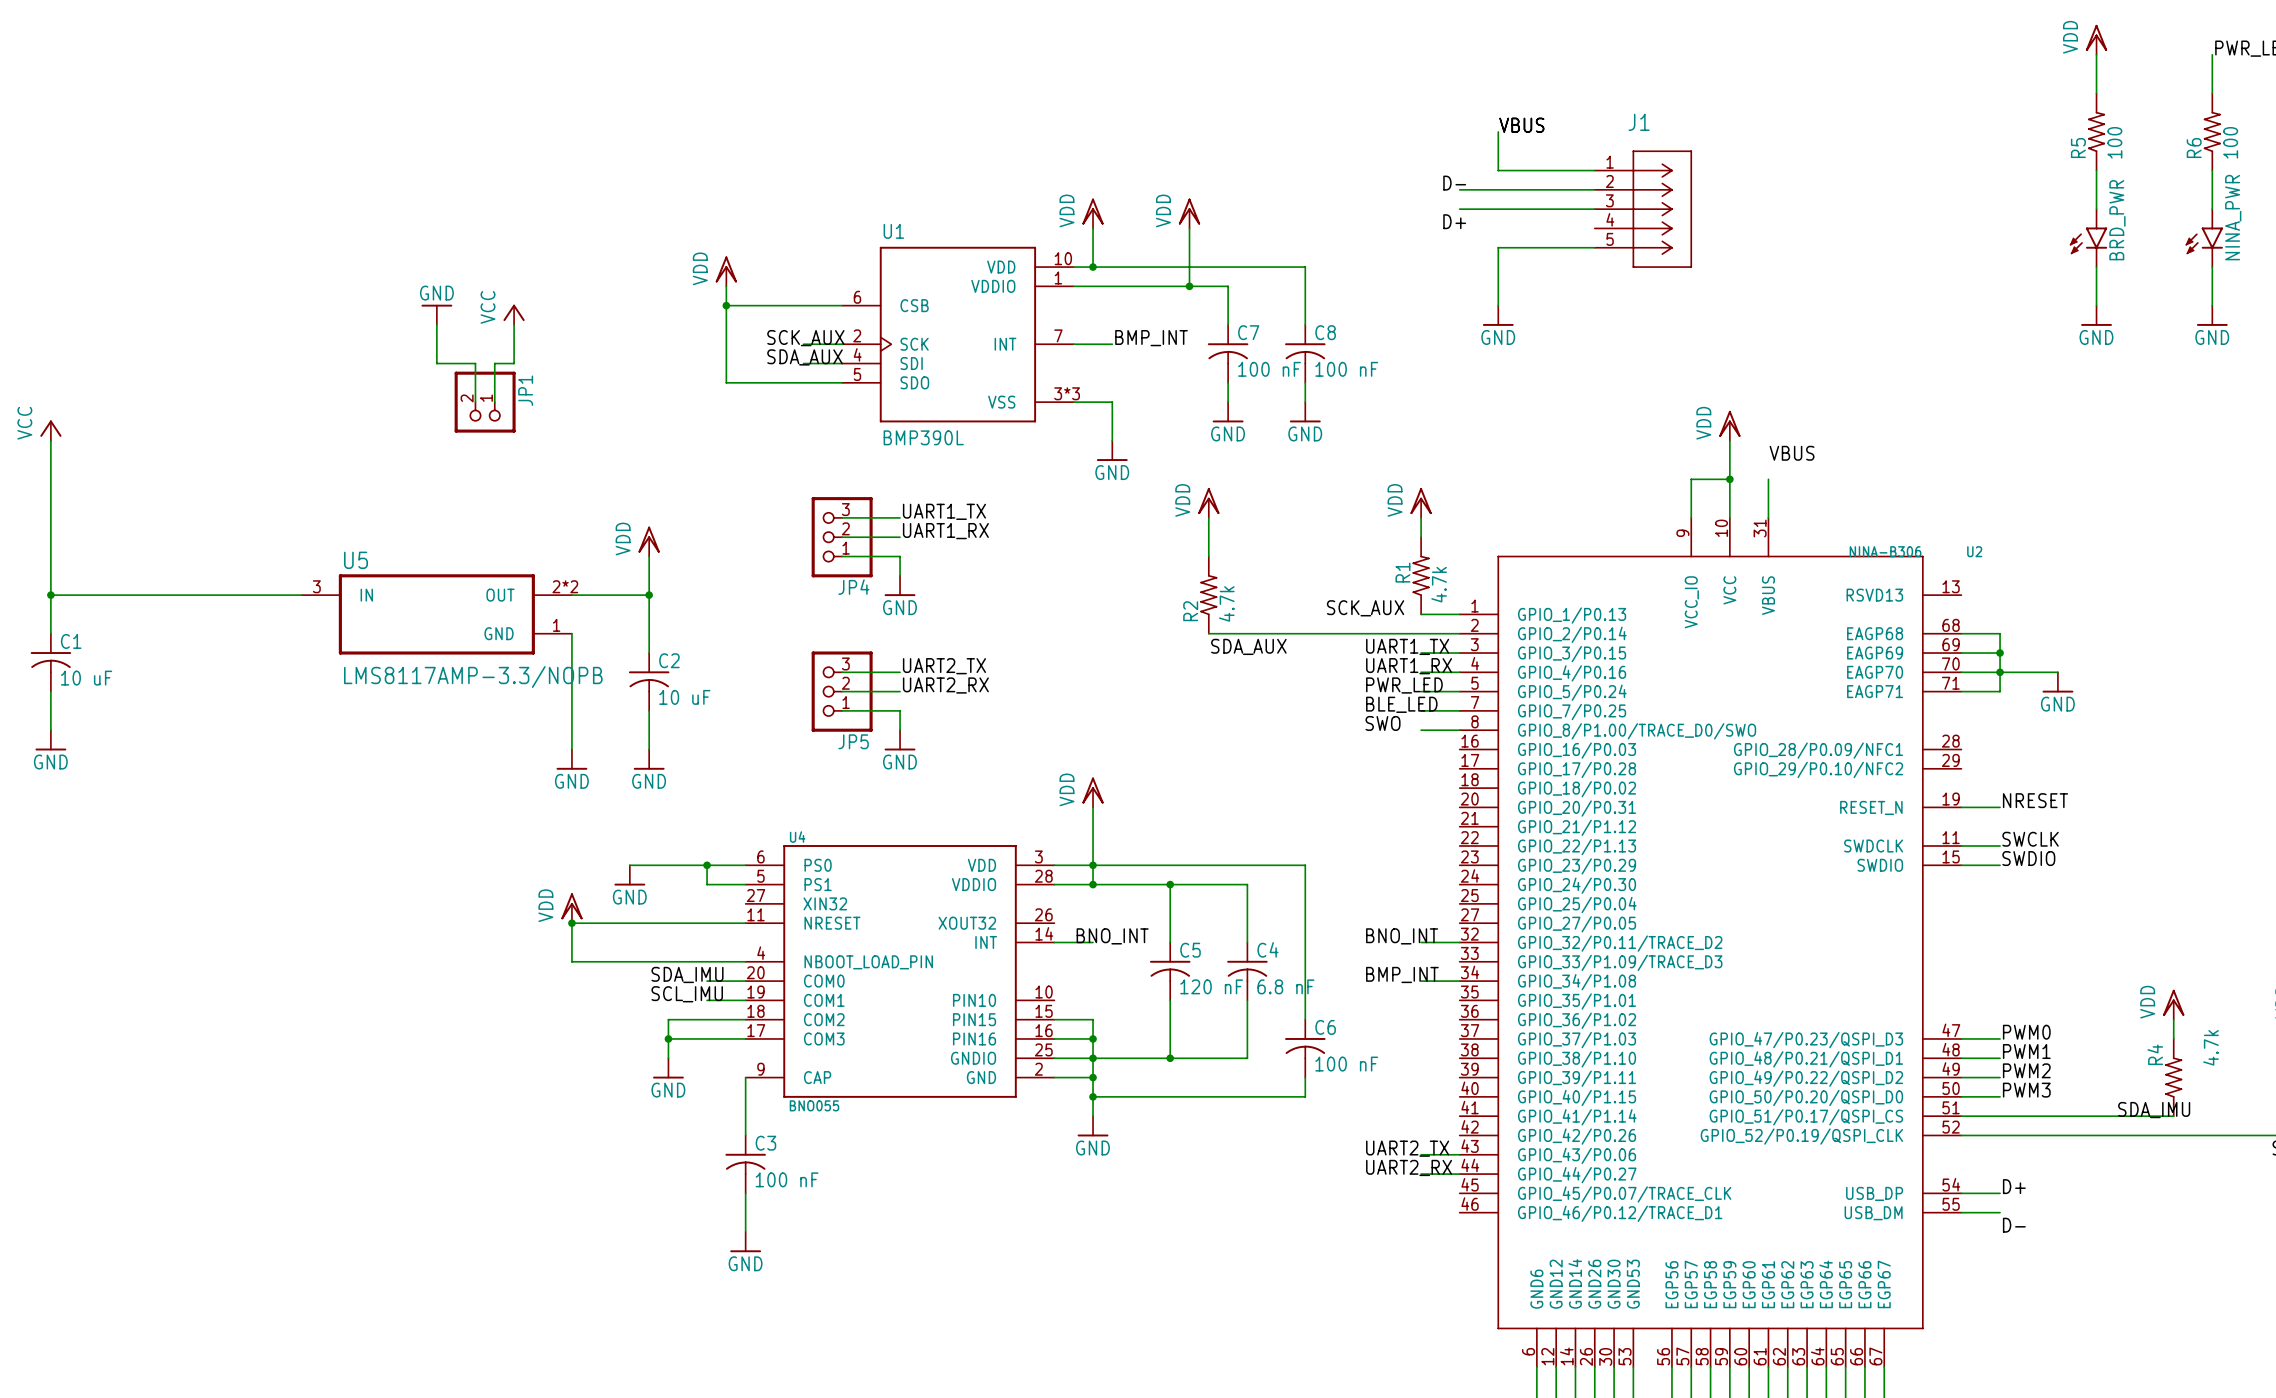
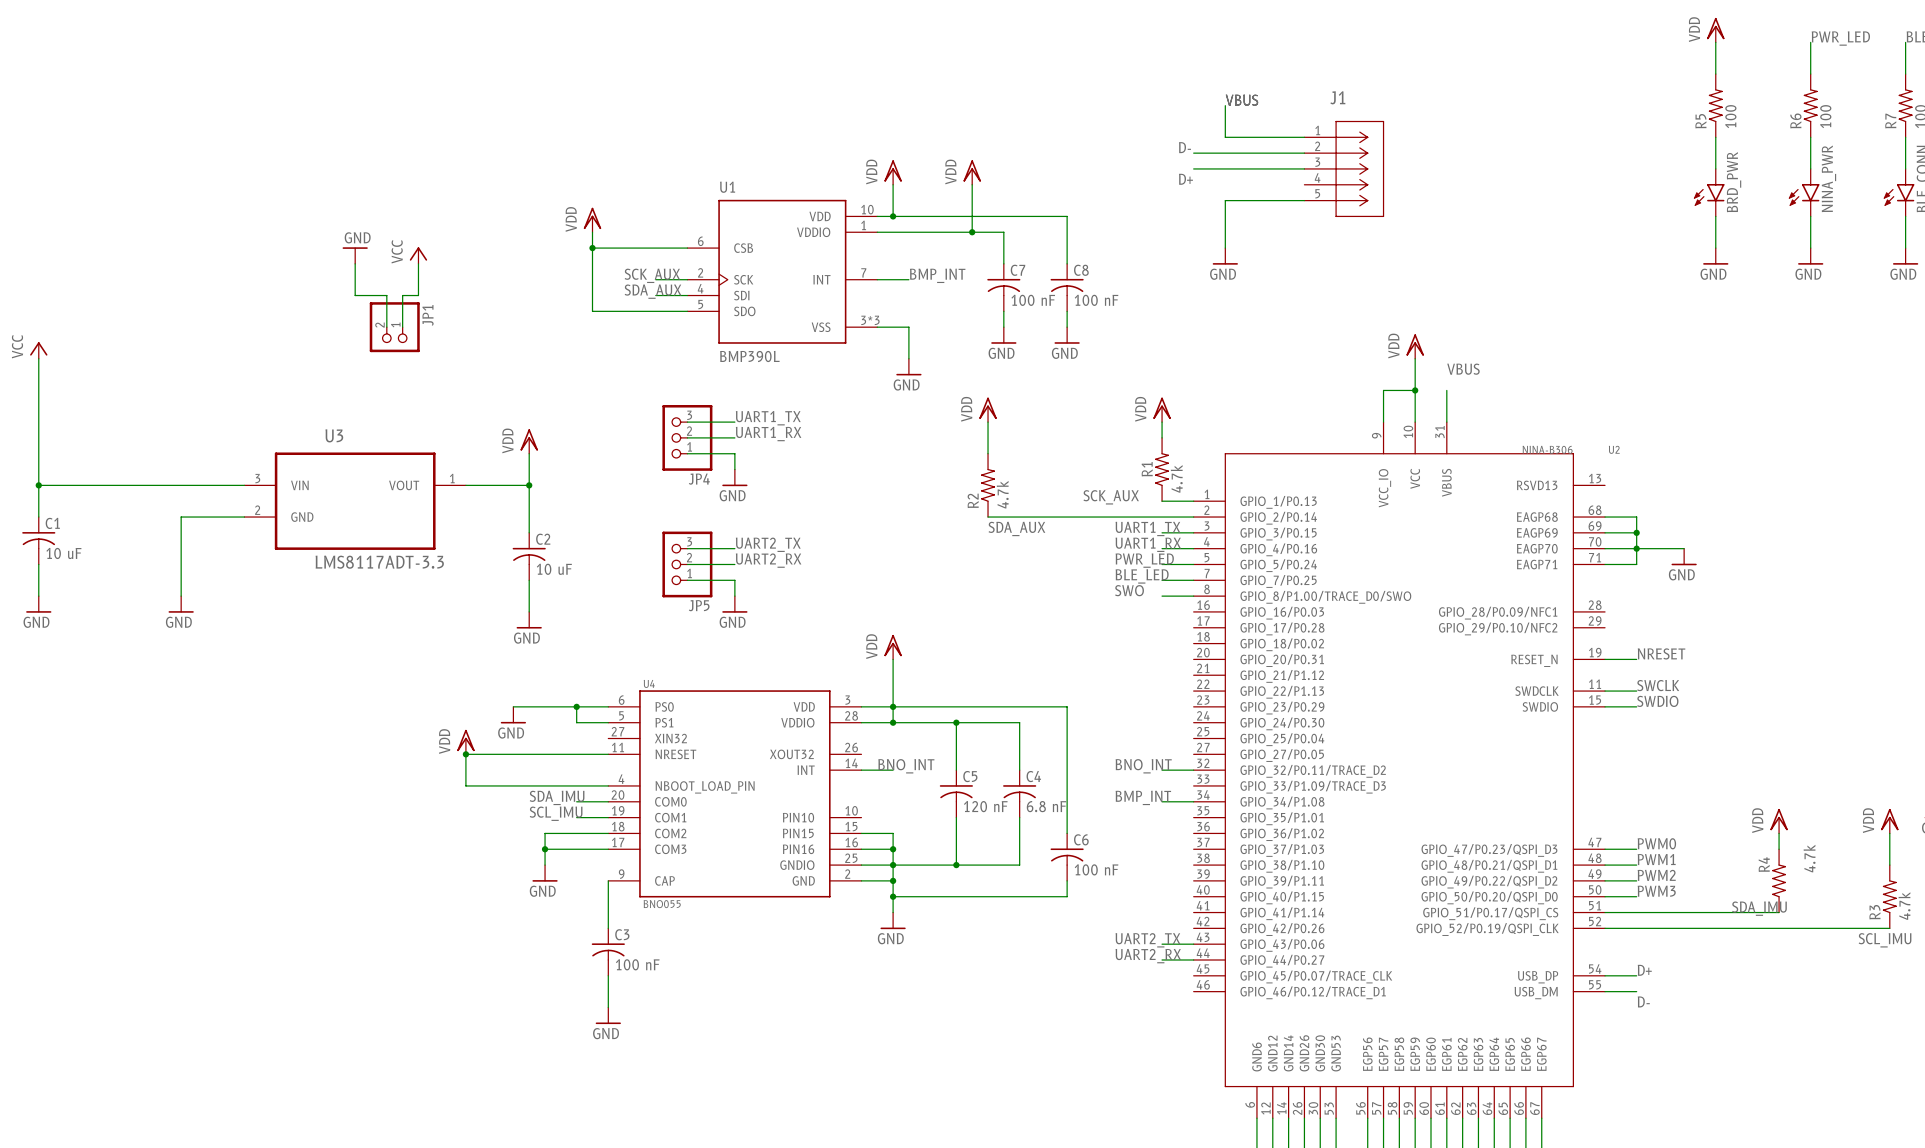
U5: LMS8117AMP-3.3/NOPB (436, 614) -> none
U3: none -> LMS8117ADT-3.3 (355, 501)
wire: none -> (244, 517) (181, 517) (181, 596)
wire: (571, 633) (571, 749) -> none
power symbol: none -> GND (181, 604)
power symbol: GND (571, 759) -> none

